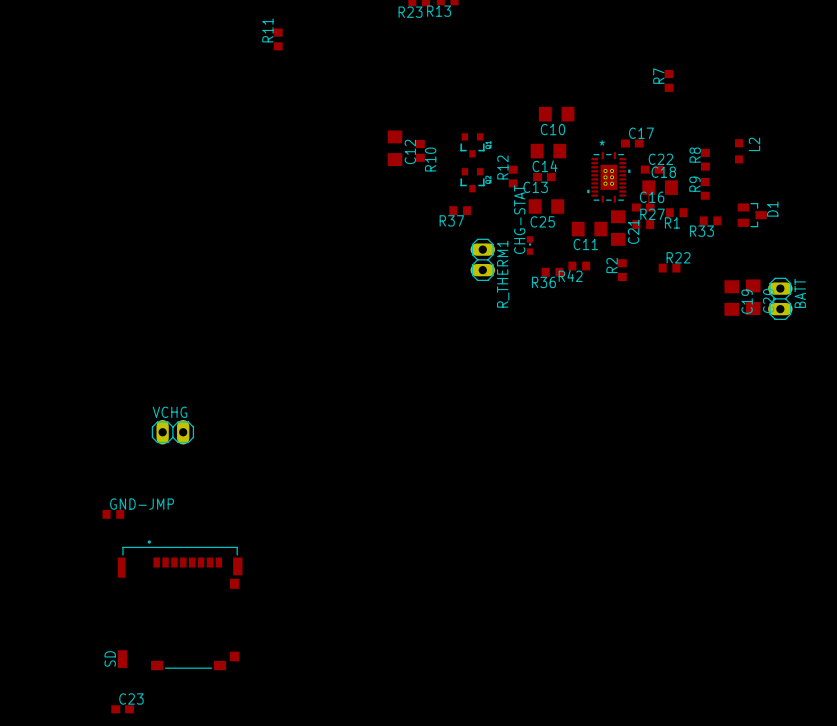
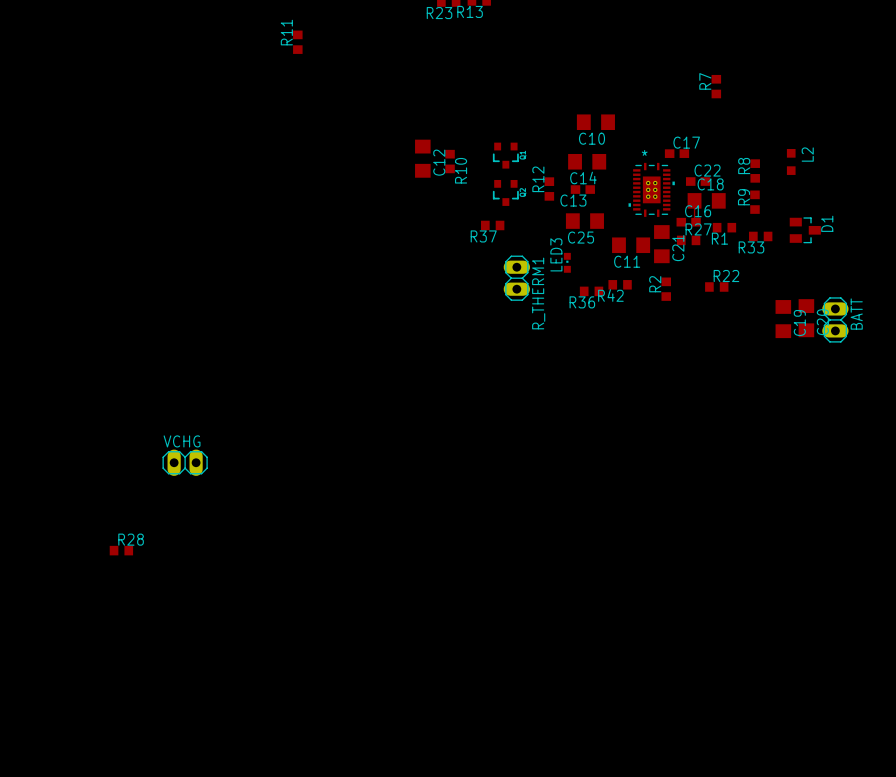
CHG-STAT name: CHG-STAT (519, 219) -> LED3 (556, 254)
GND-JMP name: GND-JMP (142, 504) -> R28 (131, 539)
SD: (180, 605) -> none
C23: (122, 709) -> none

